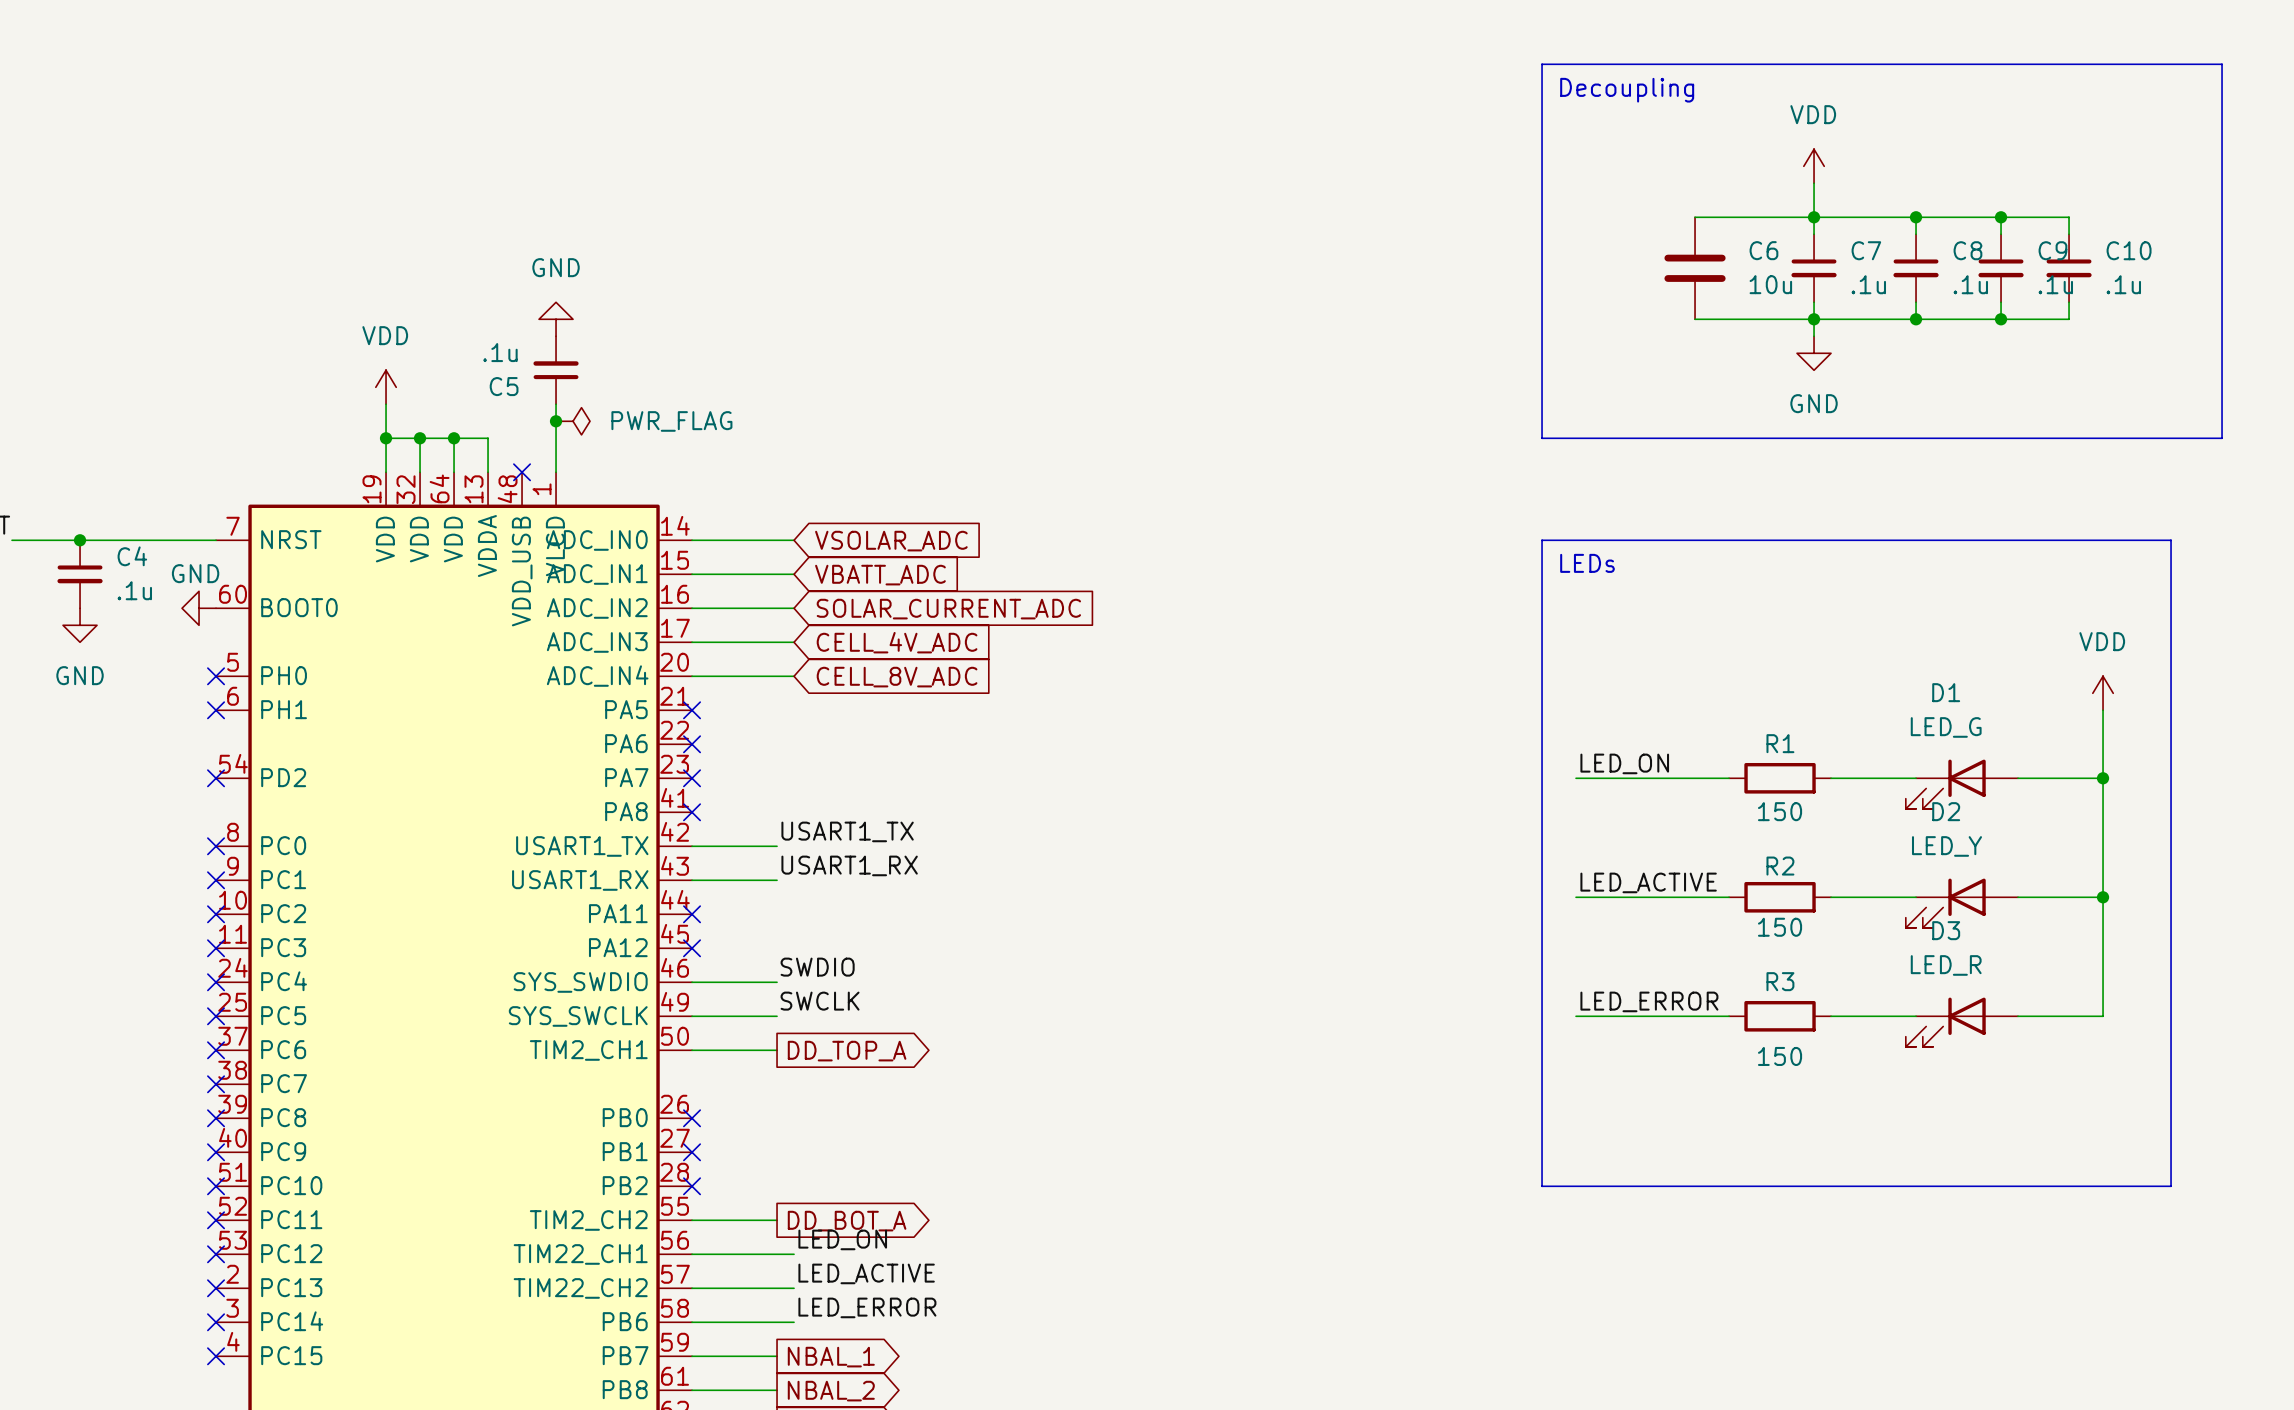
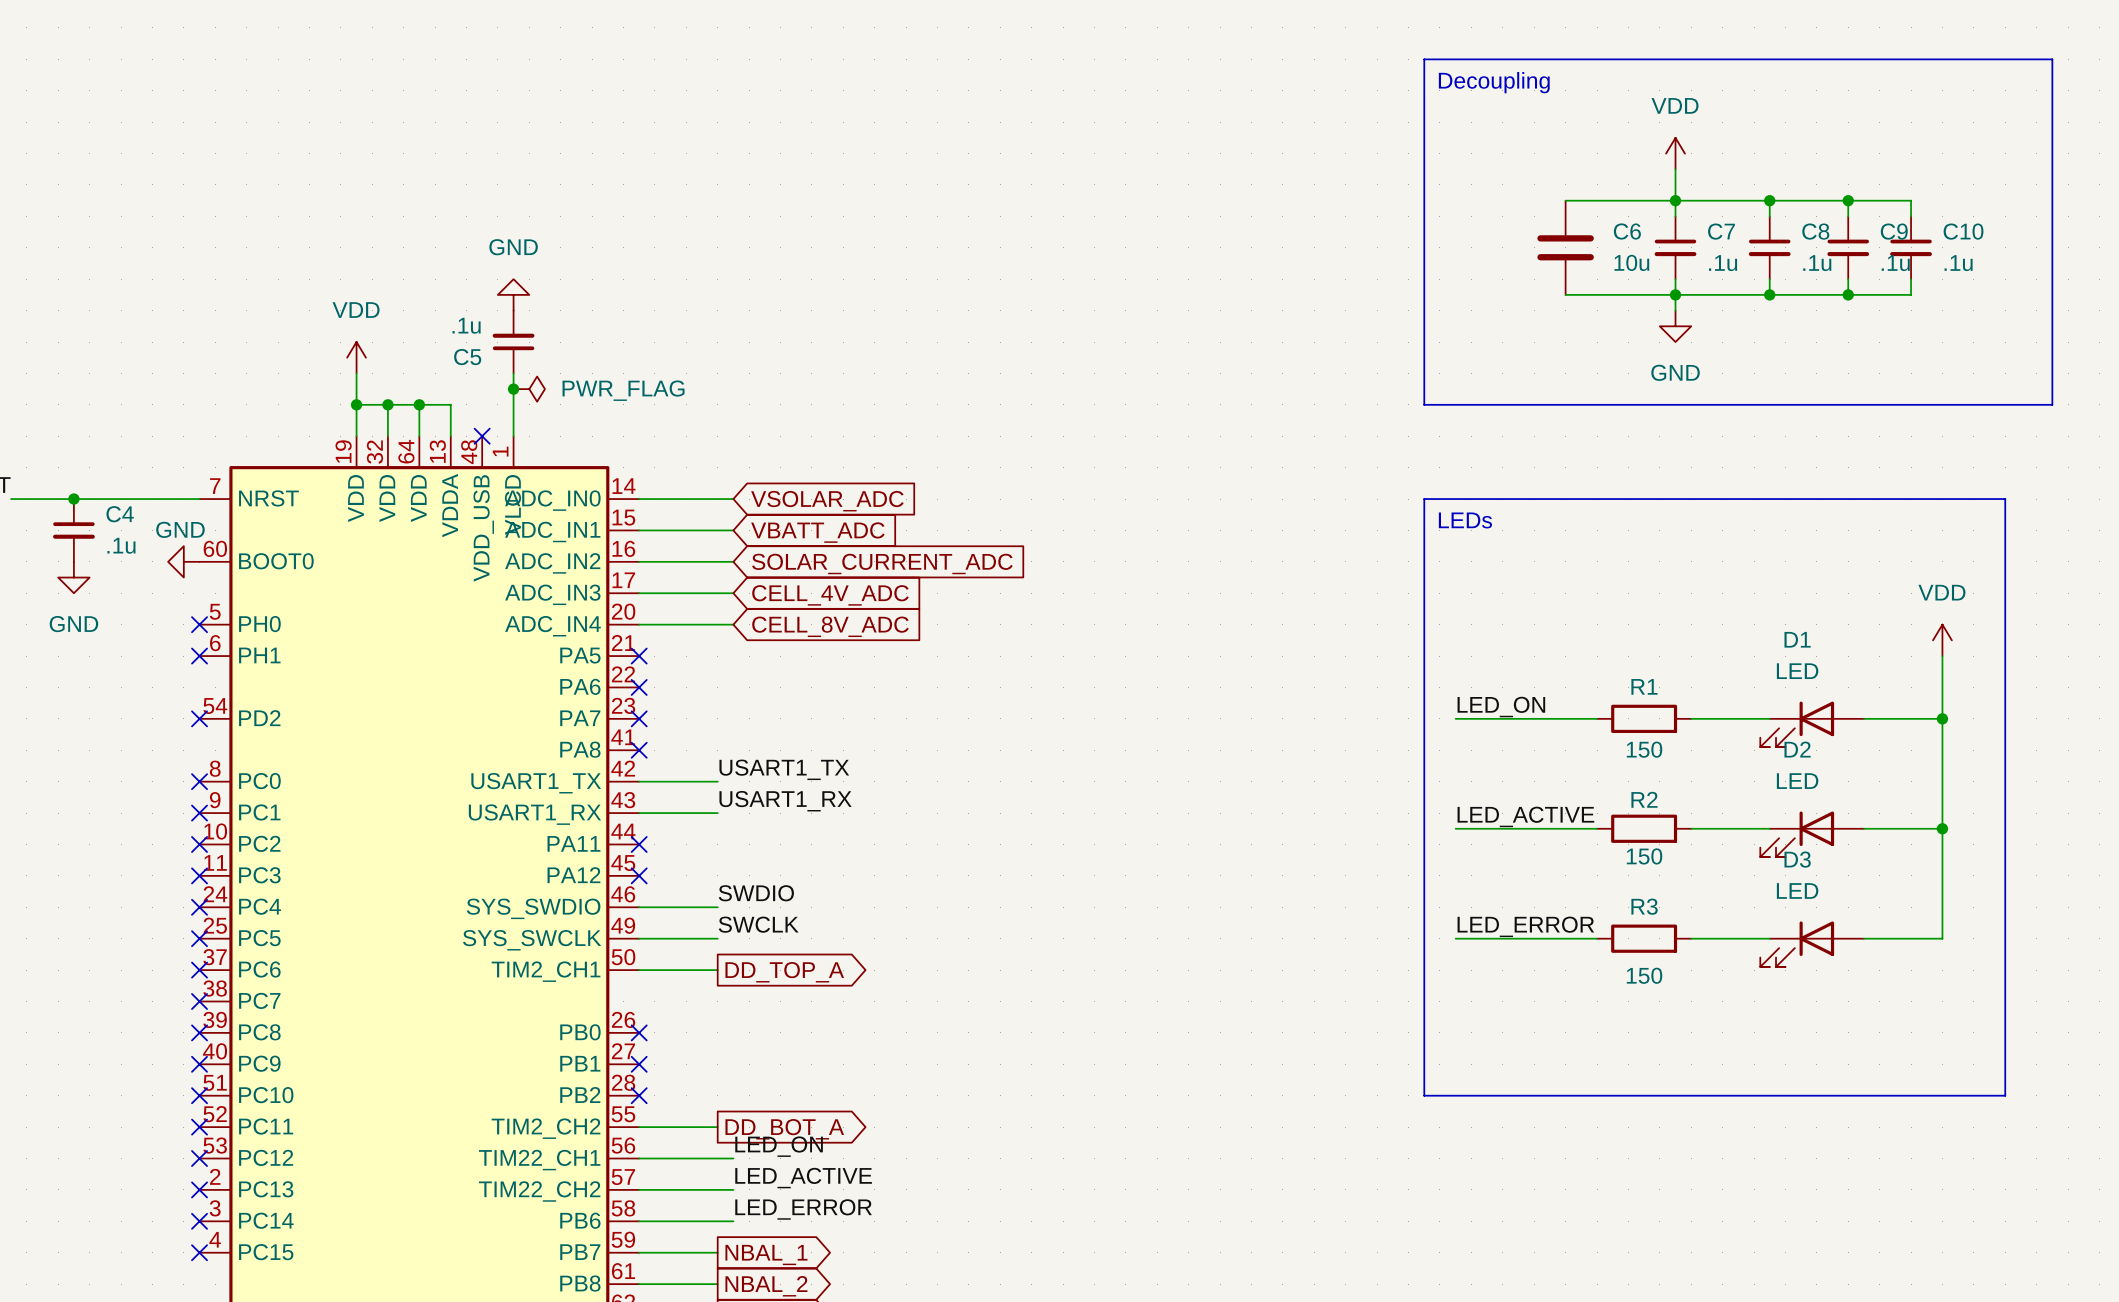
D1 value: LED_G (1946, 727) -> LED (1797, 671)
D2 value: LED_Y (1946, 846) -> LED (1797, 781)
D3 value: LED_R (1946, 965) -> LED (1797, 890)

